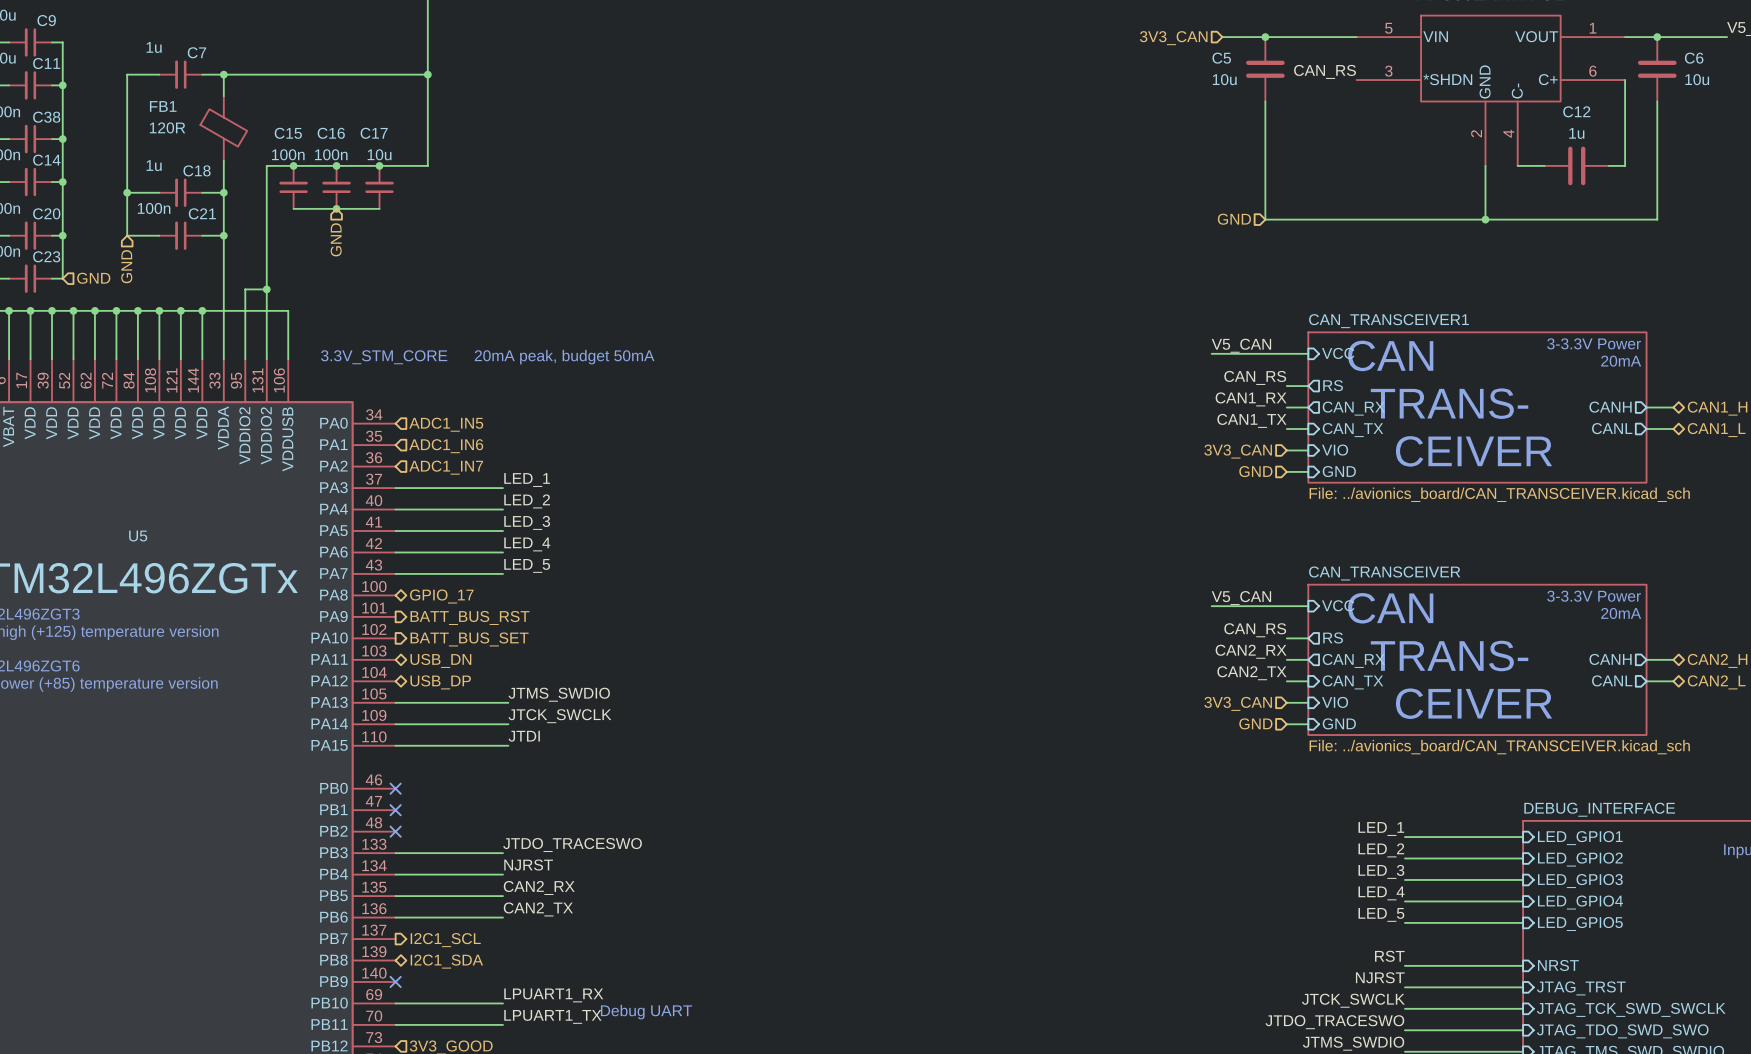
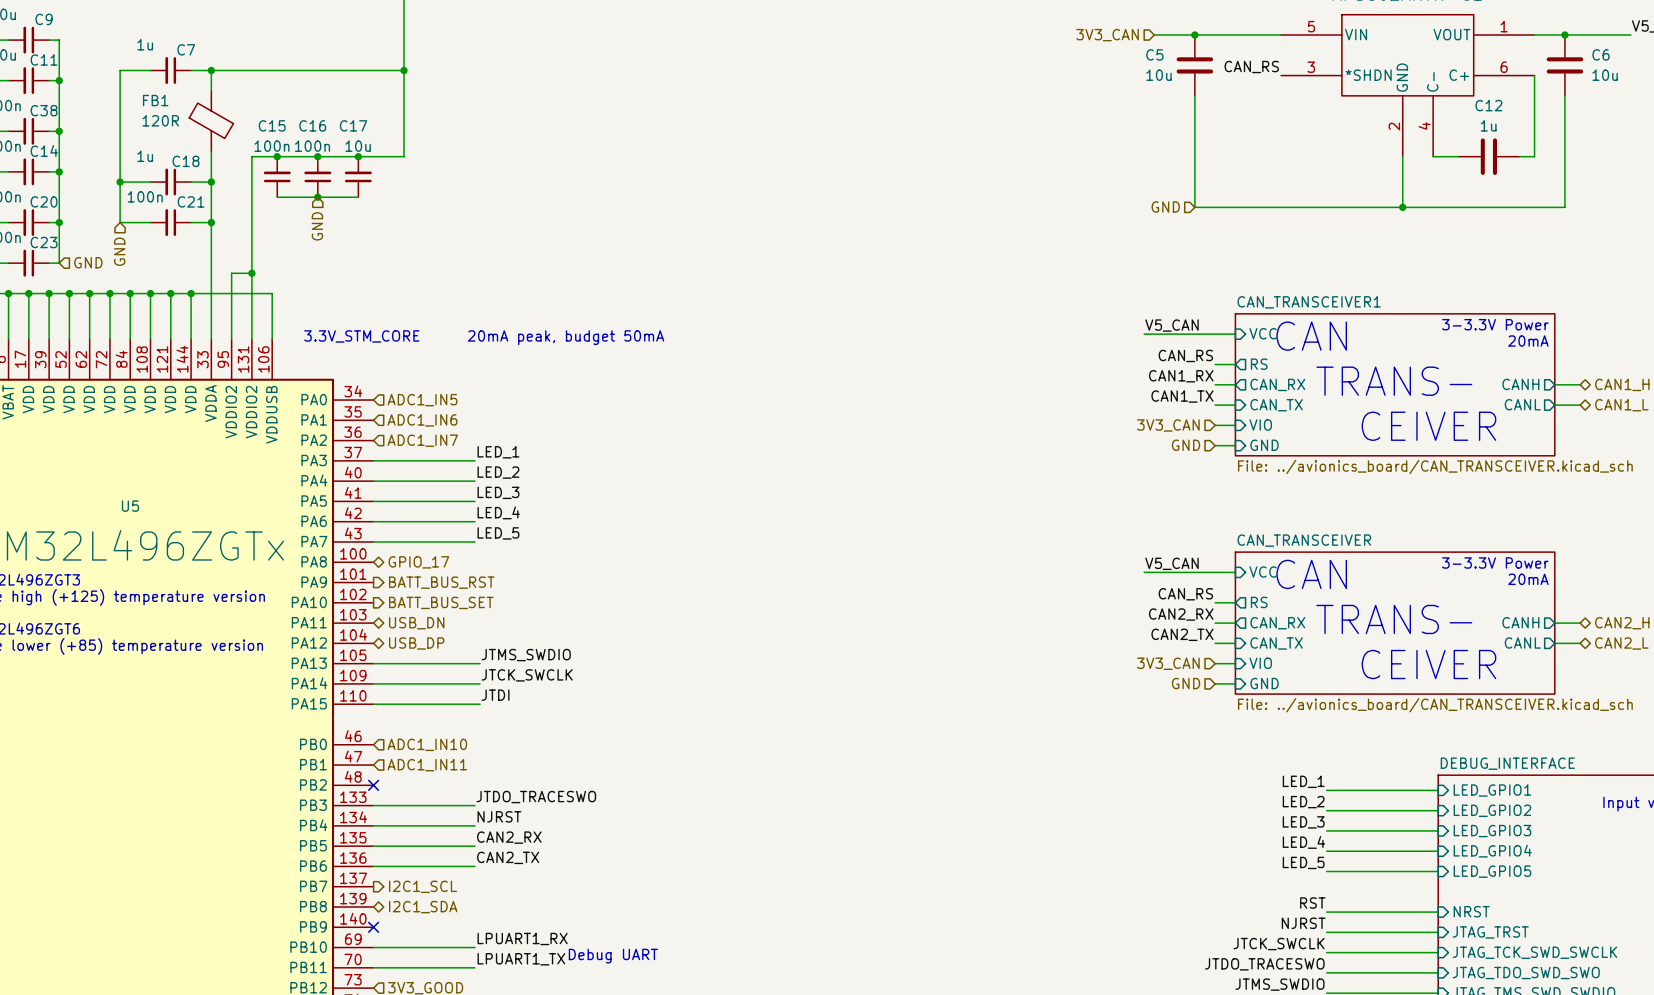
no-connect mark: (395, 788) -> none
hierarchical label: none -> ADC1_IN10 (427, 744)
no-connect mark: (395, 810) -> none
hierarchical label: none -> ADC1_IN11 (427, 765)

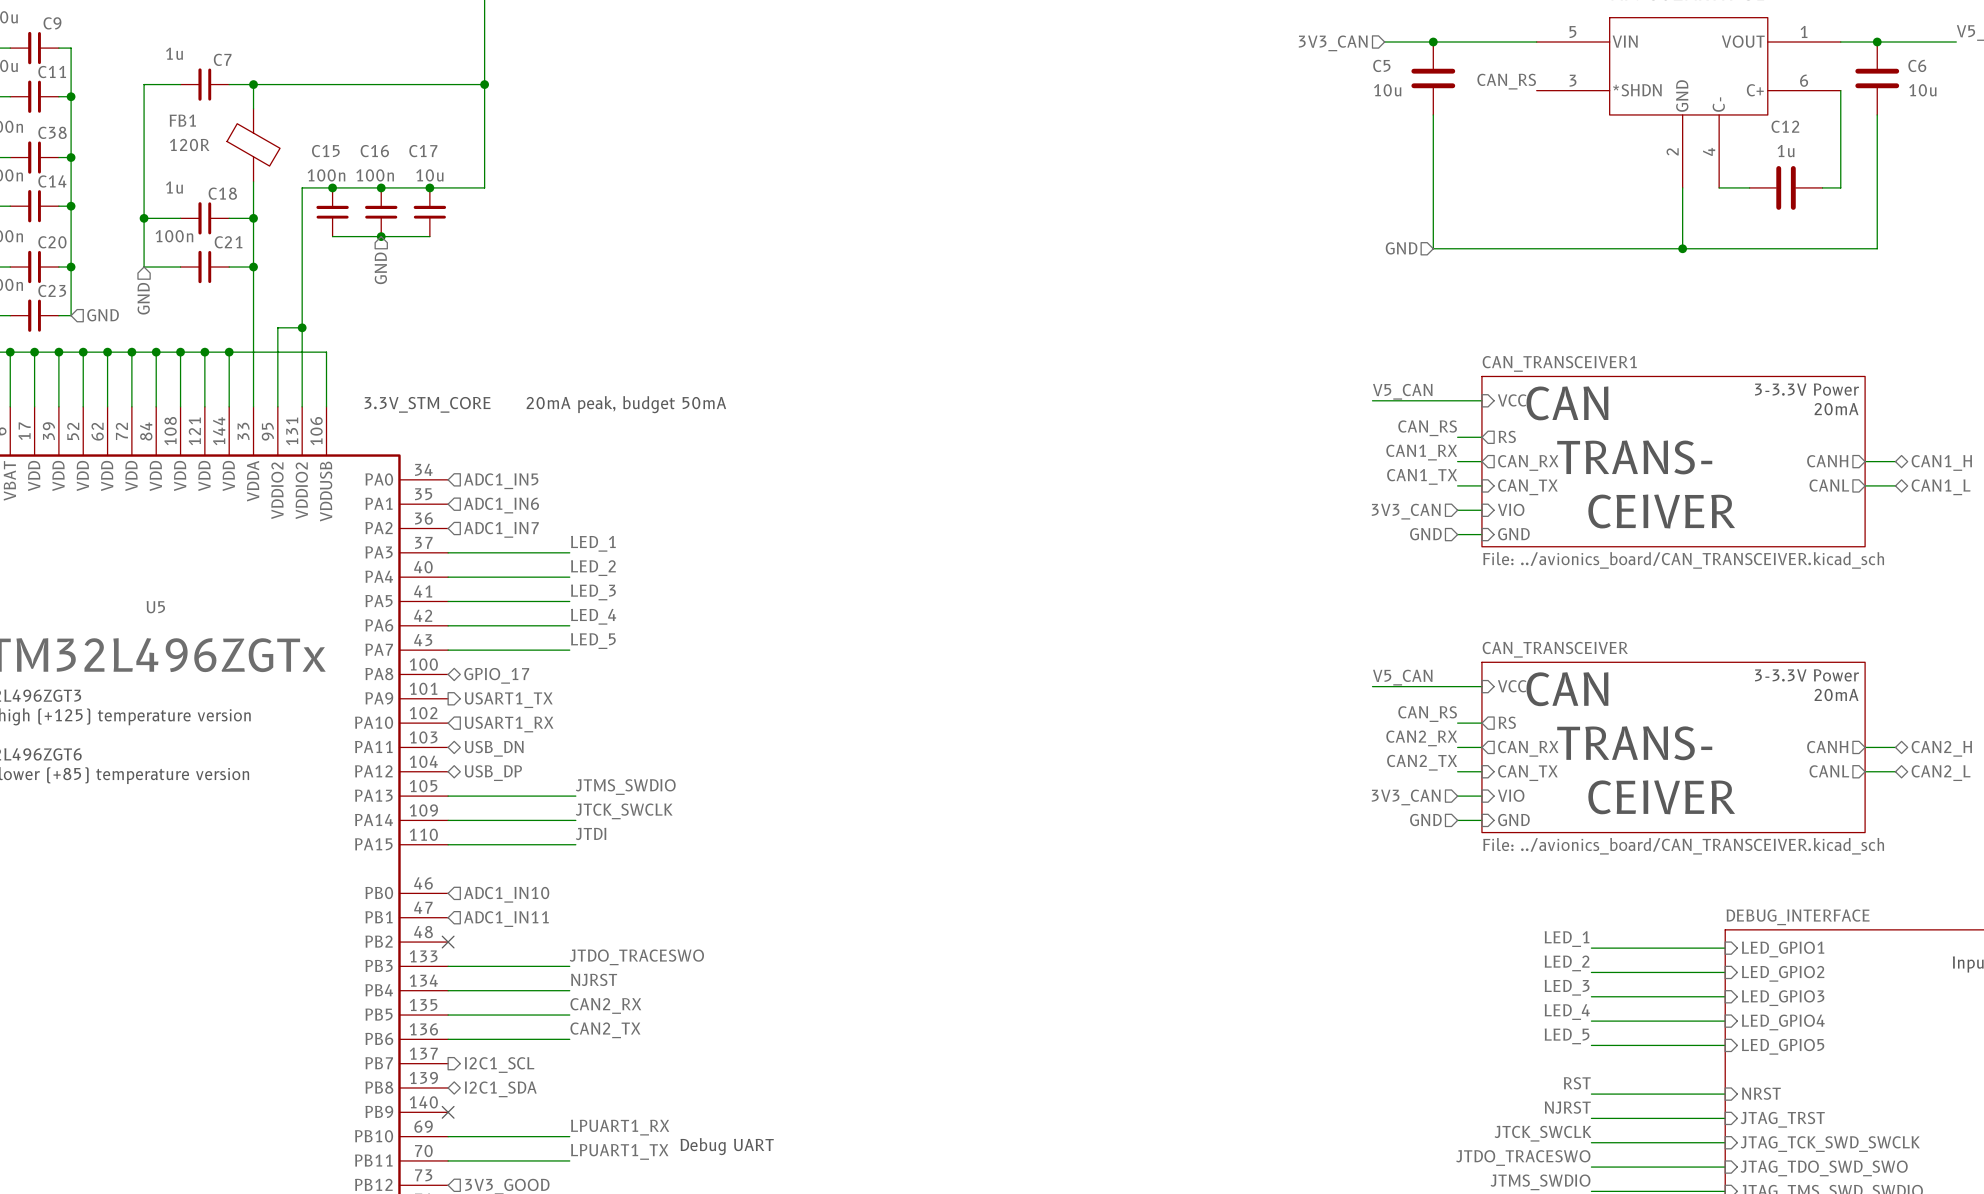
hierarchical label: BATT_BUS_RST (441, 582) -> USART1_TX (508, 700)
hierarchical label shape: output (441, 602) -> input (509, 724)
hierarchical label: BATT_BUS_SET (441, 602) -> USART1_RX (509, 724)

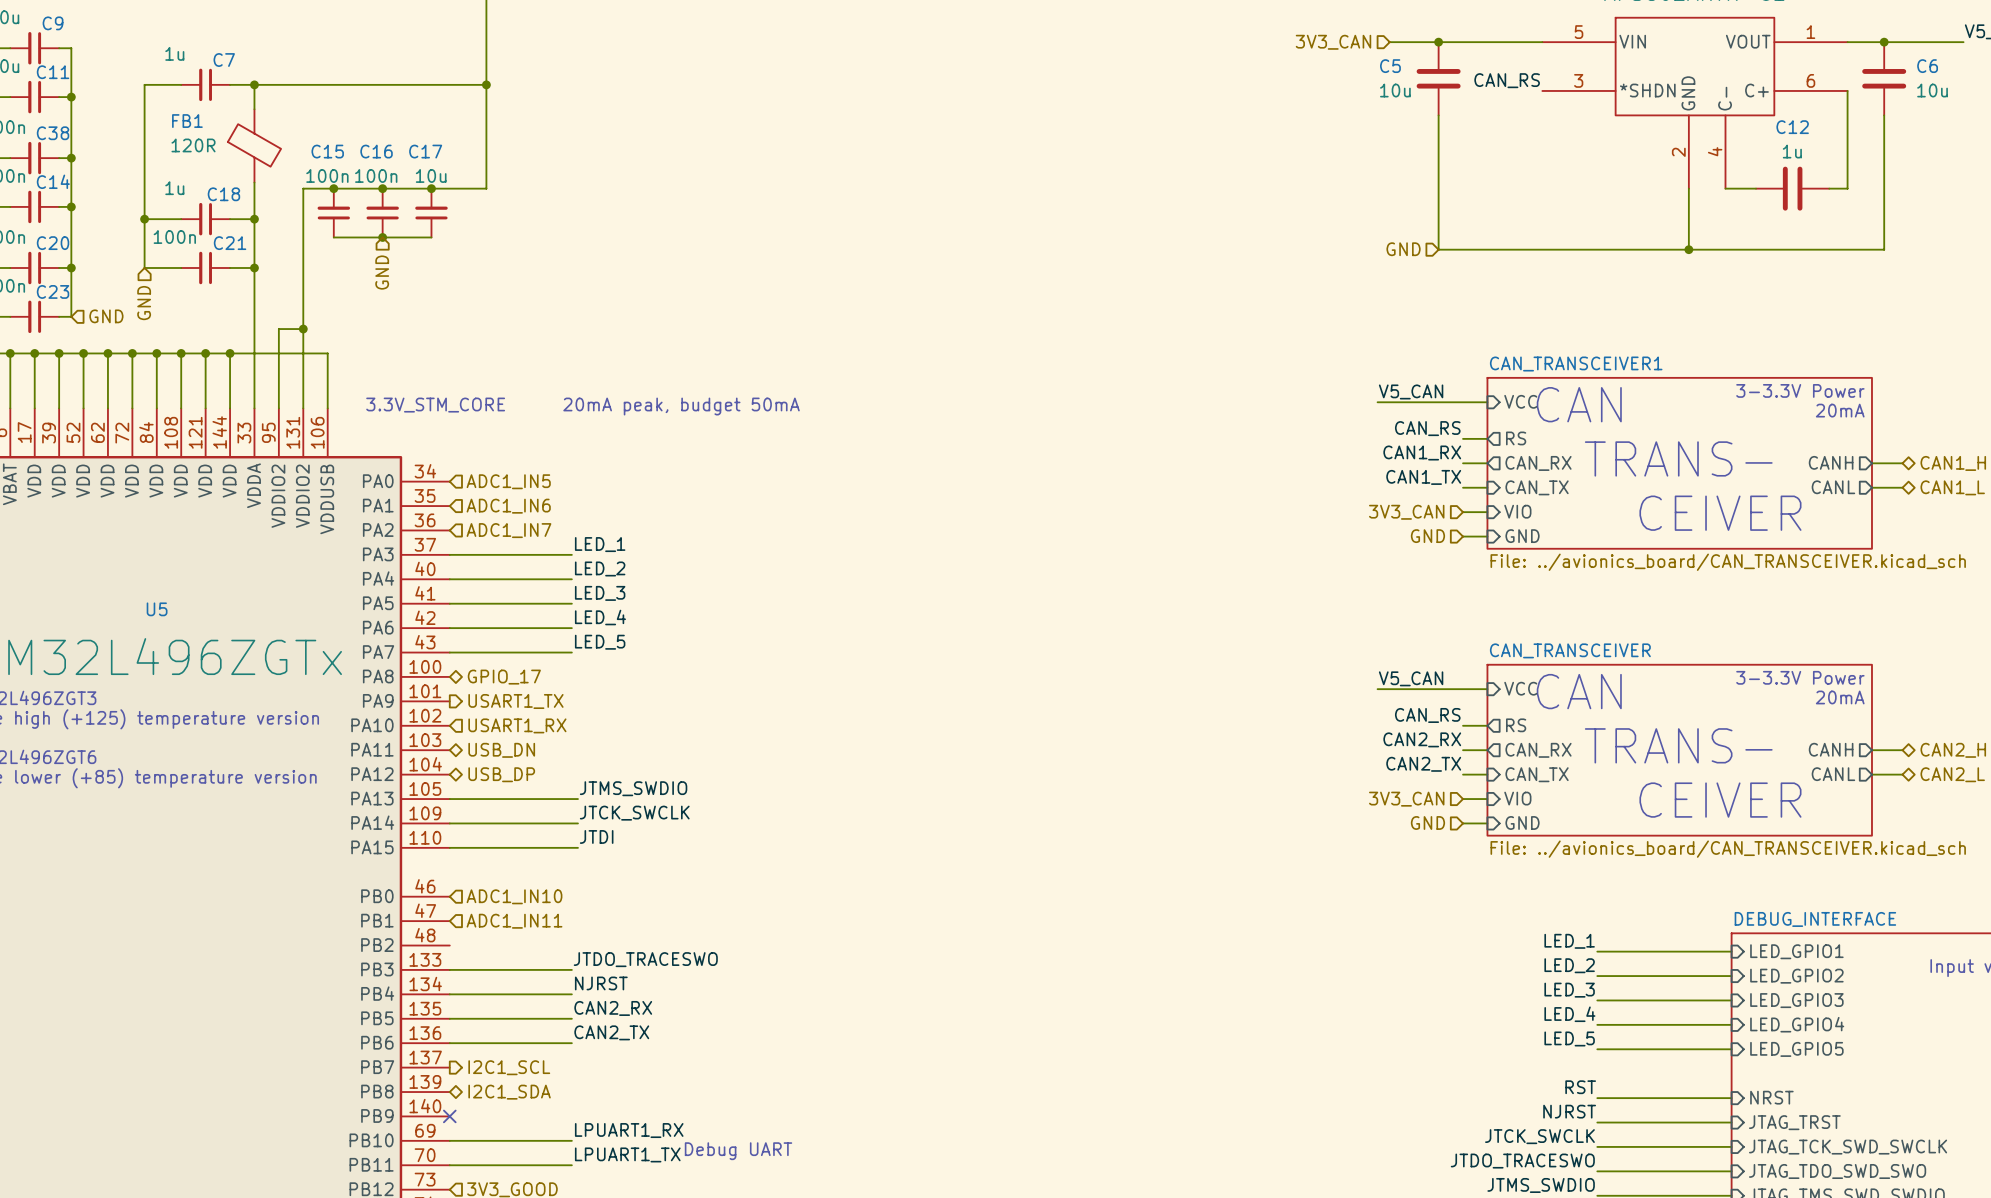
no-connect mark: (448, 942) -> none

